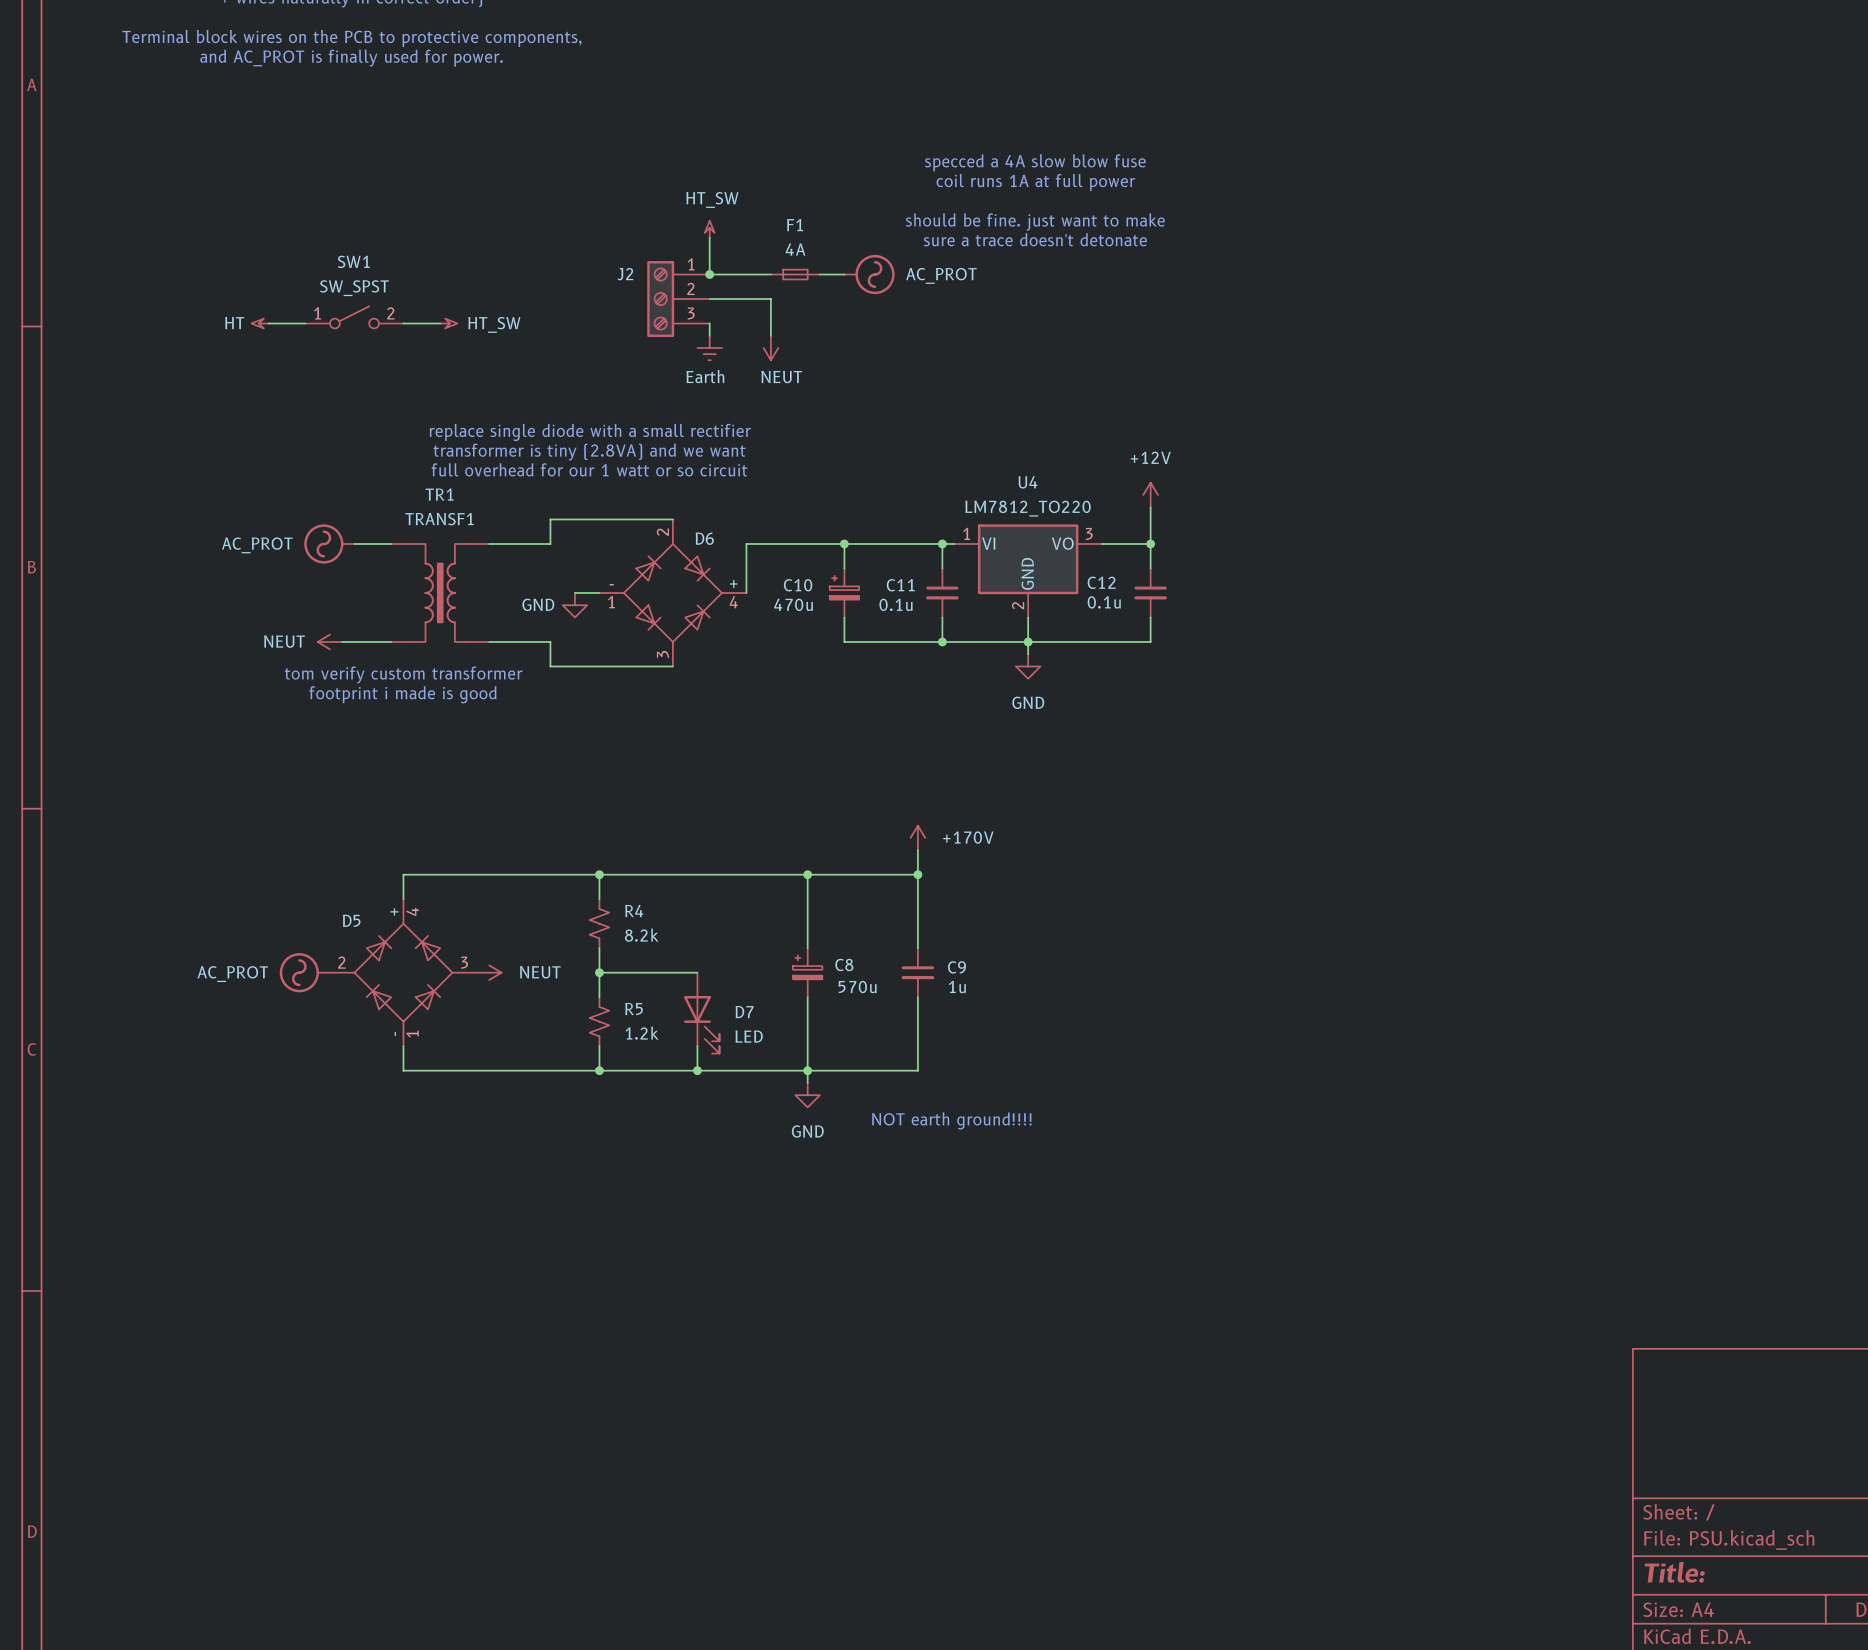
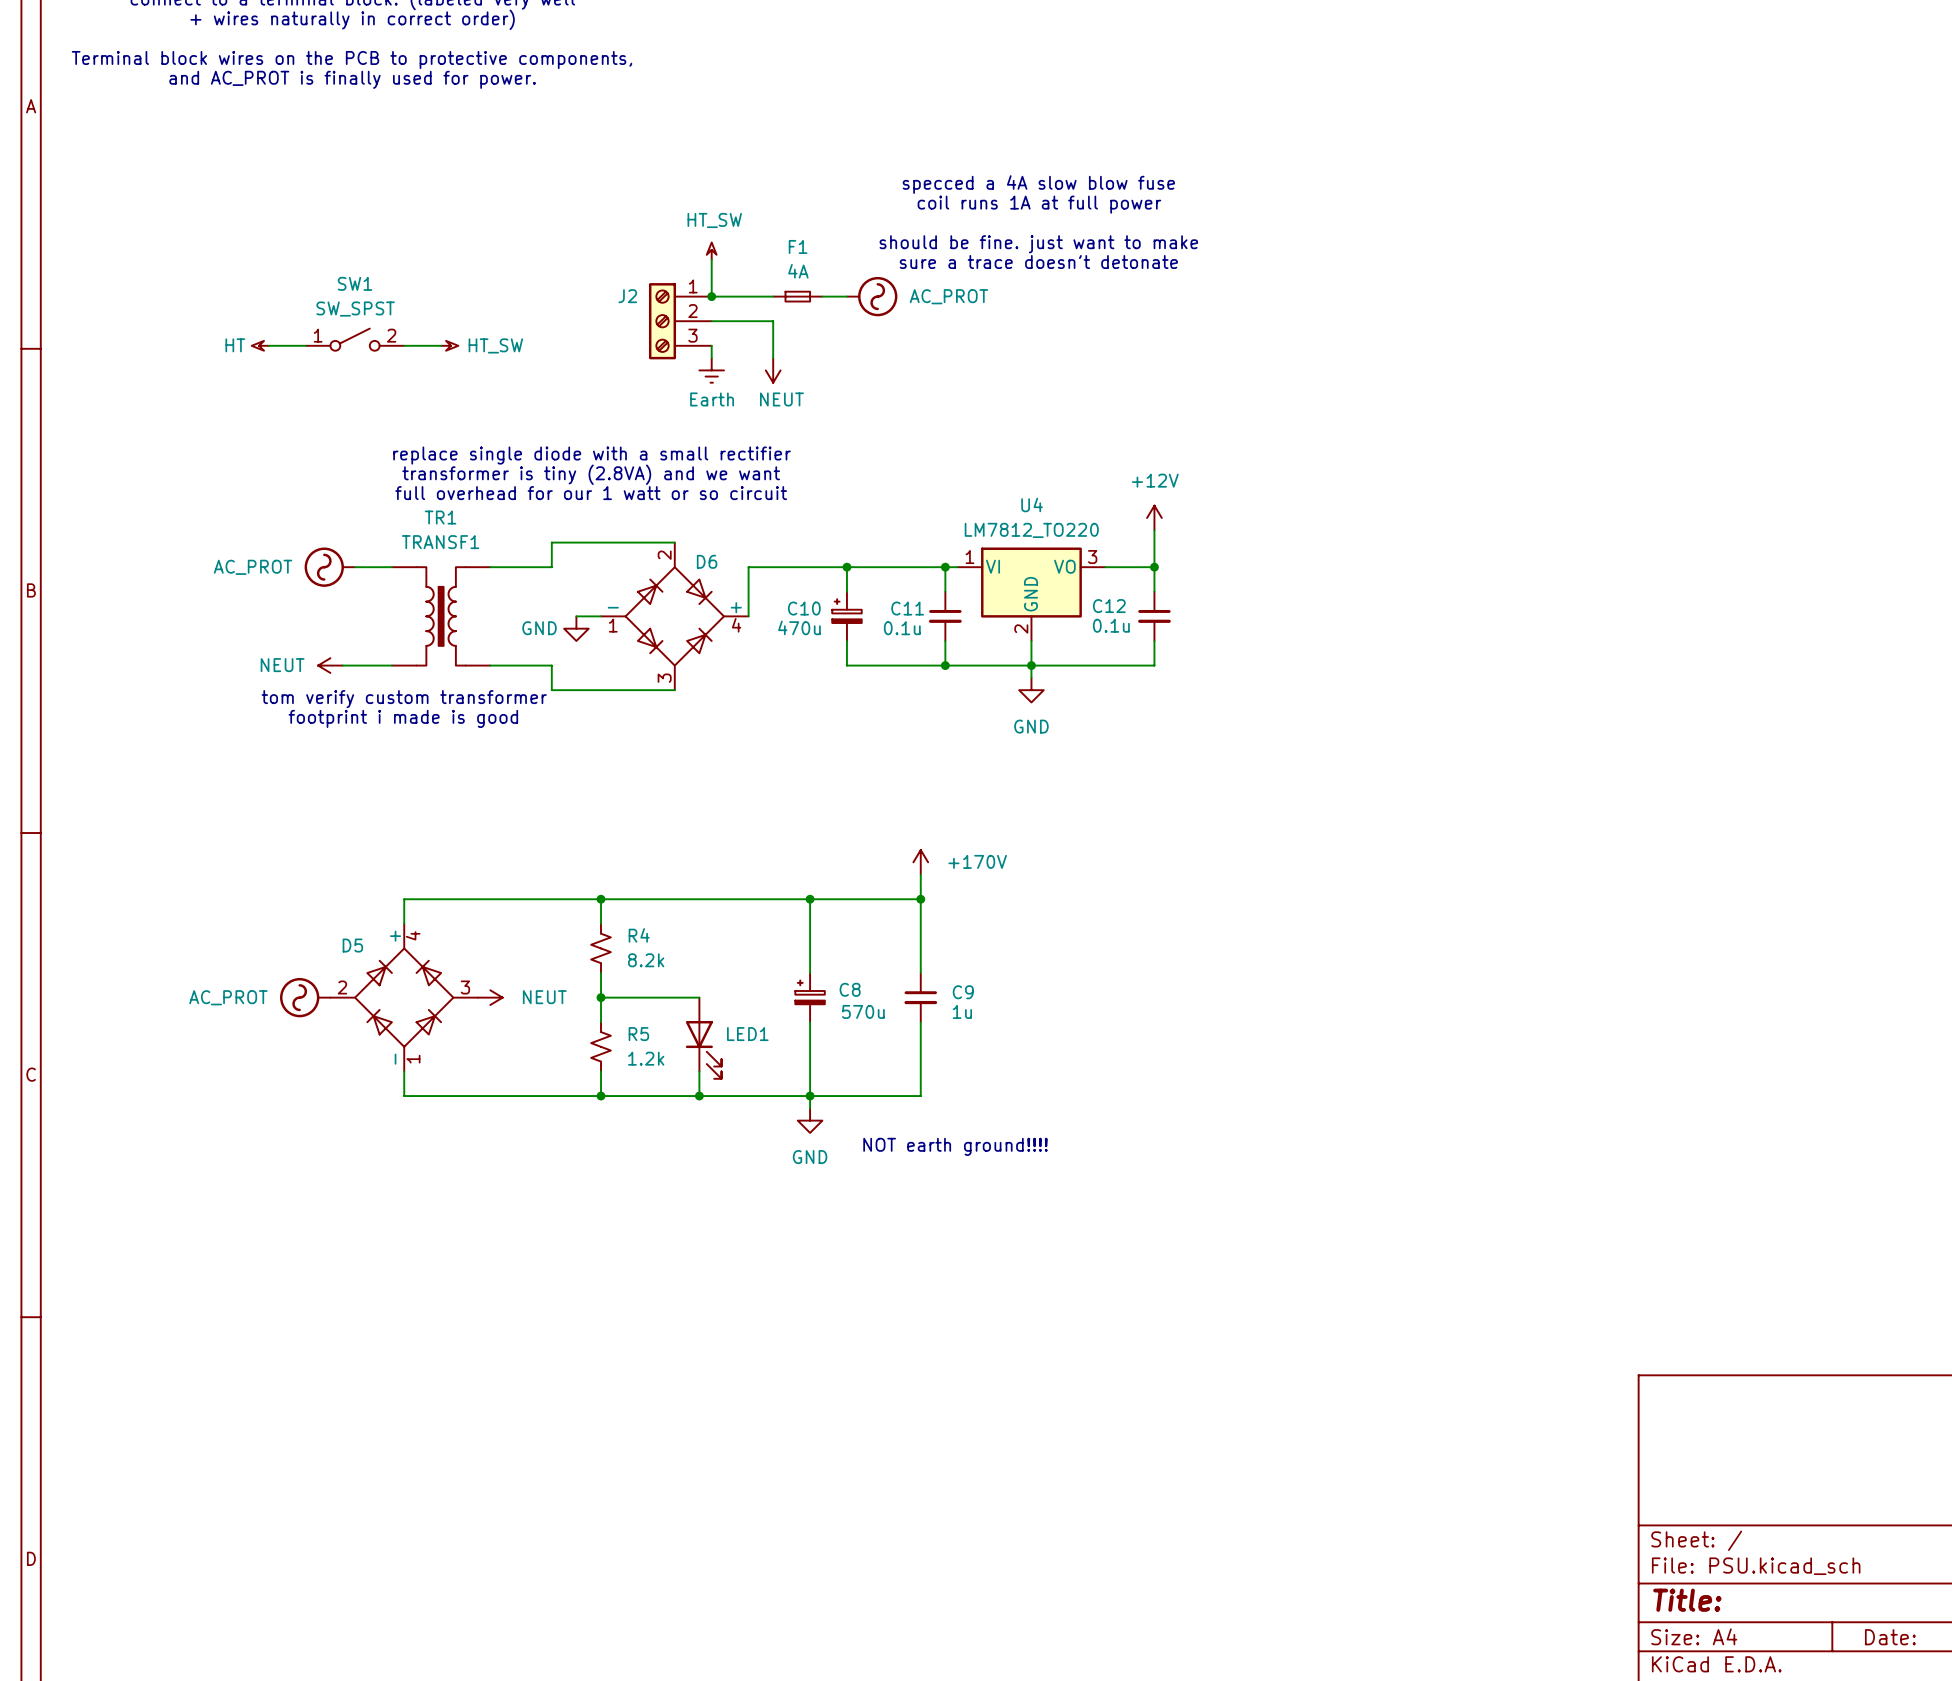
D7 name: D7 (744, 1012) -> LED1 (747, 1034)
D7 value: LED (749, 1036) -> none

